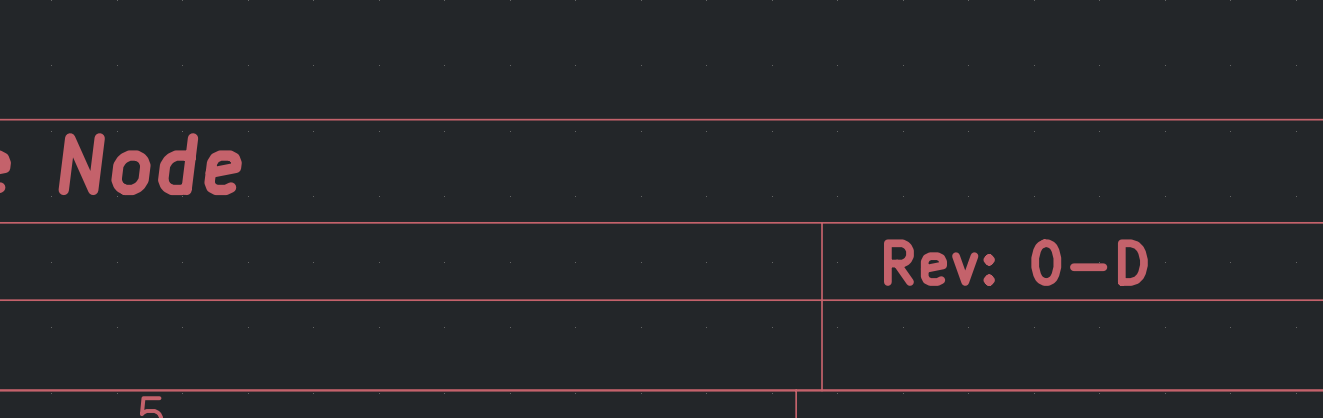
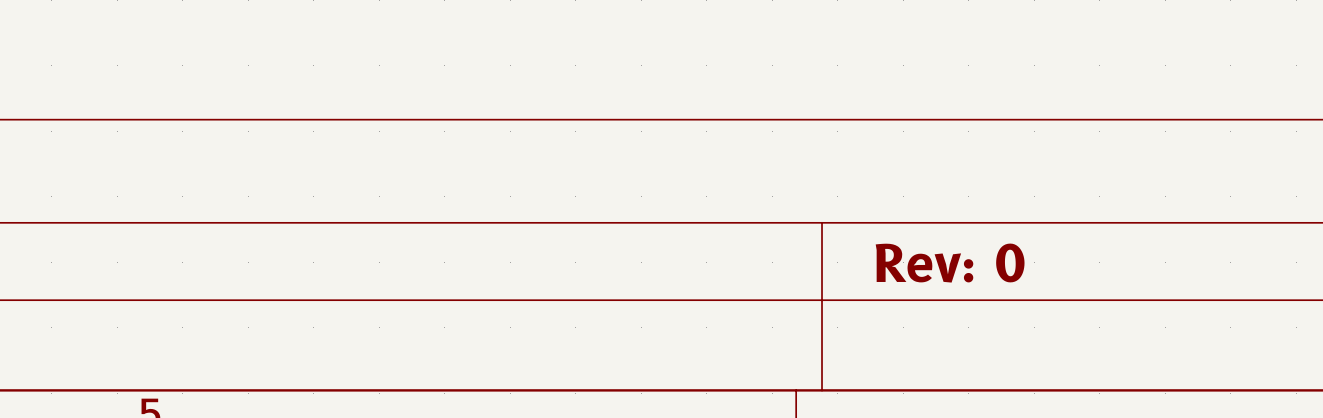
title block: Rev: 0-D (1015, 262) -> Rev: 0 (950, 263)

